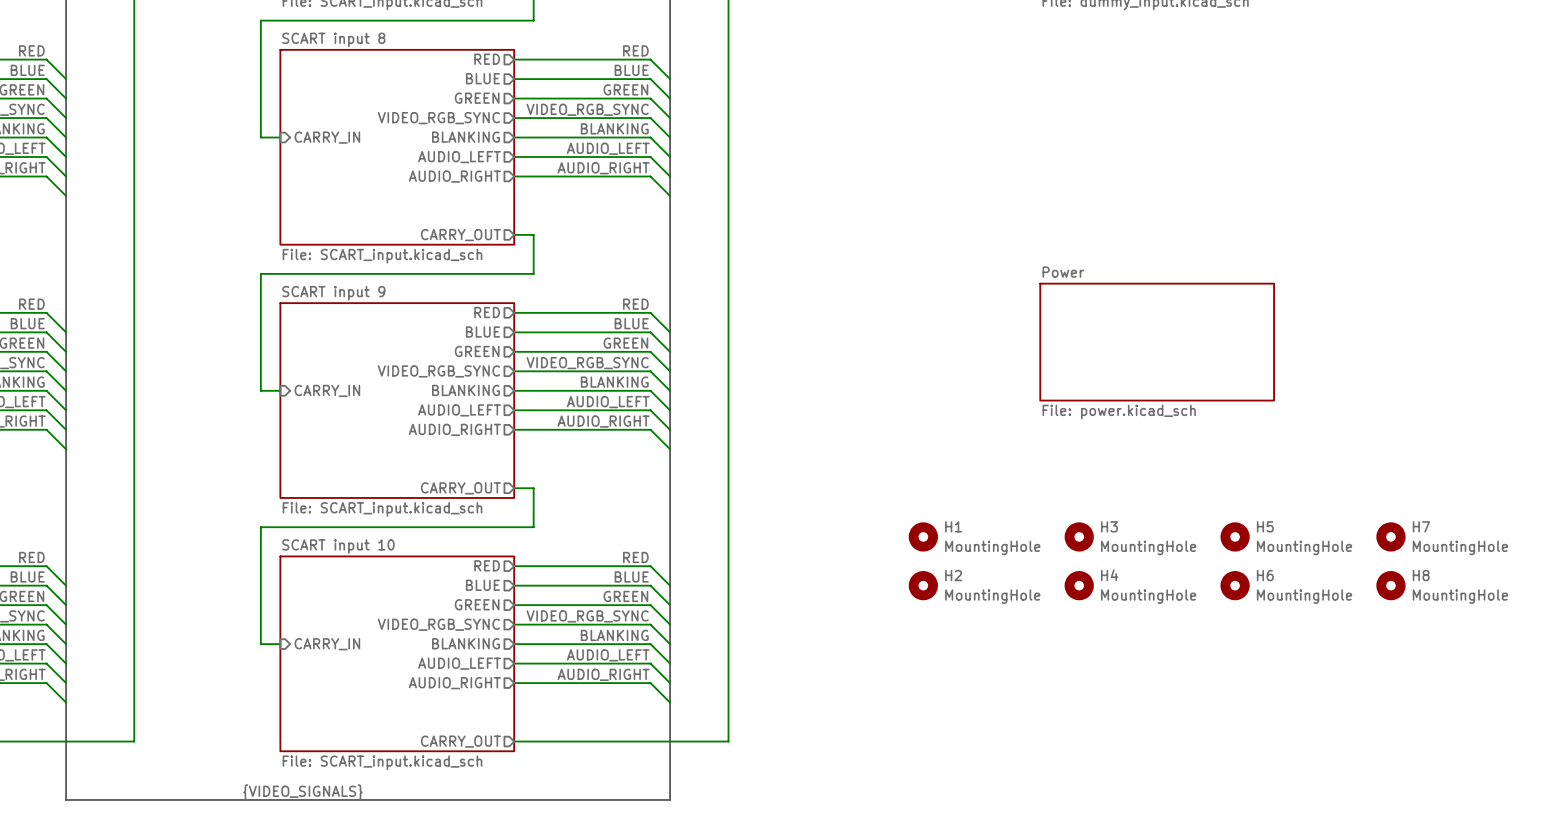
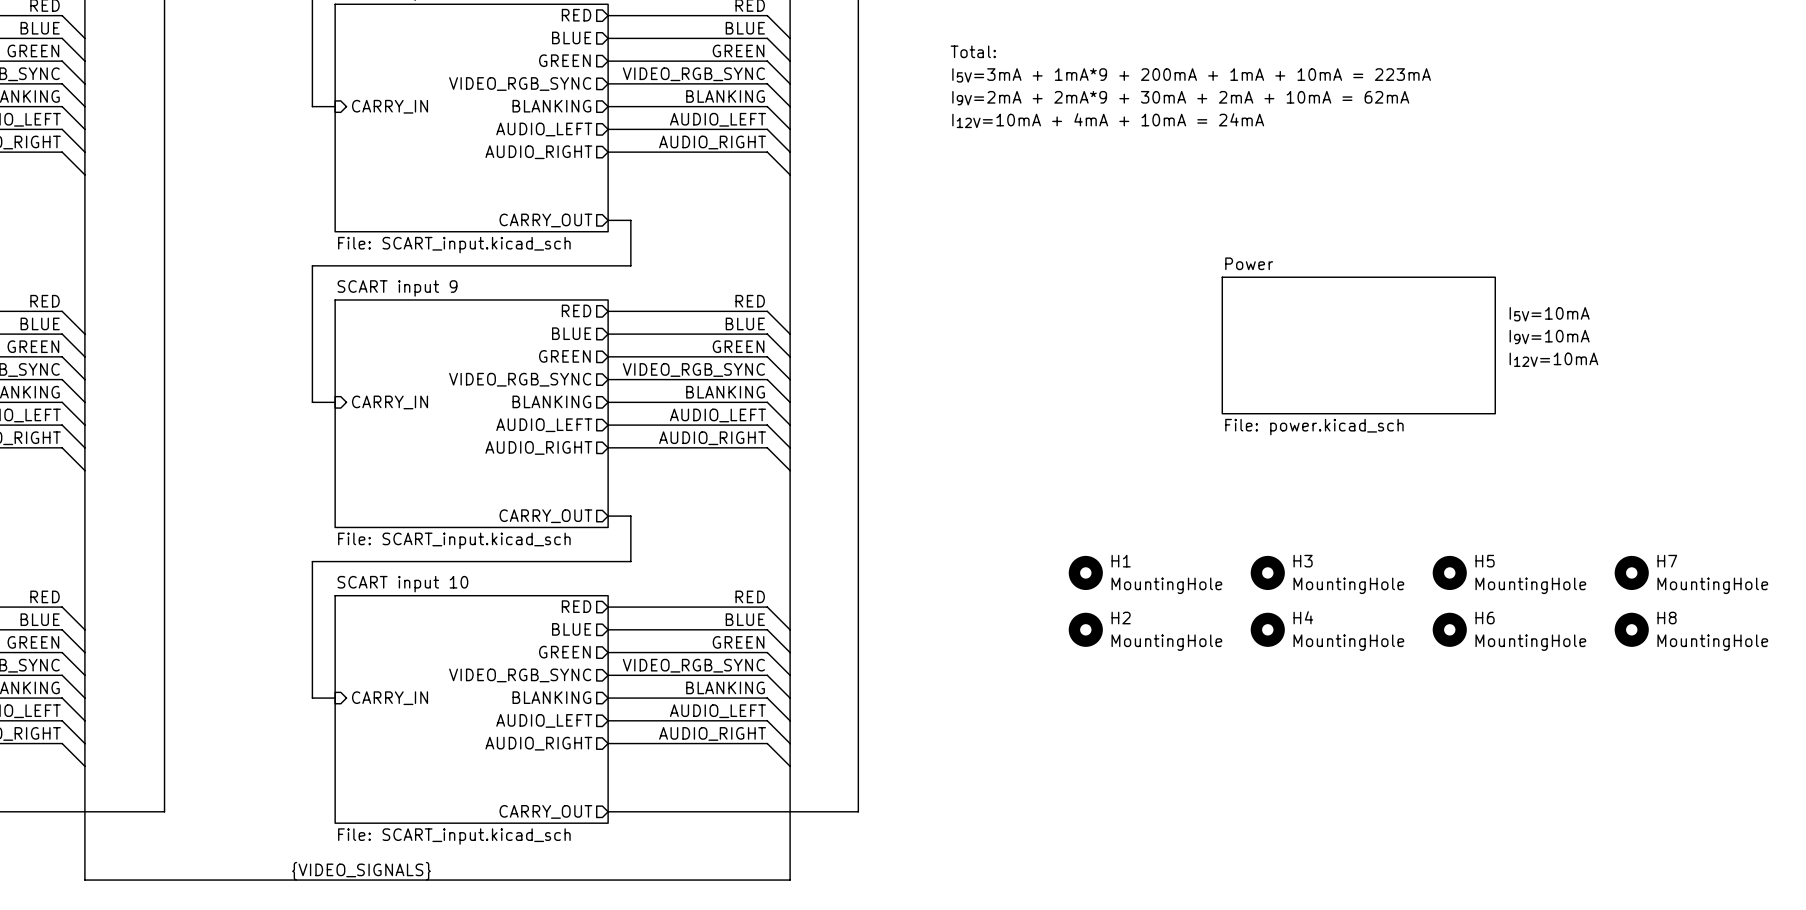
text: none -> Total: (973, 51)
text: none -> I5V=3mA + 1mA*9 + 200mA + 1mA + 10mA = 223mA (1191, 75)
text: none -> I9V=2mA + 2mA*9 + 30mA + 2mA + 10mA = 62mA (1180, 98)
text: none -> I12V=10mA + 4mA + 10mA = 24mA (1108, 120)
text: none -> I5V=10mA (1549, 314)
text: none -> I9V=10mA (1549, 337)
text: none -> I12V=10mA (1553, 359)

